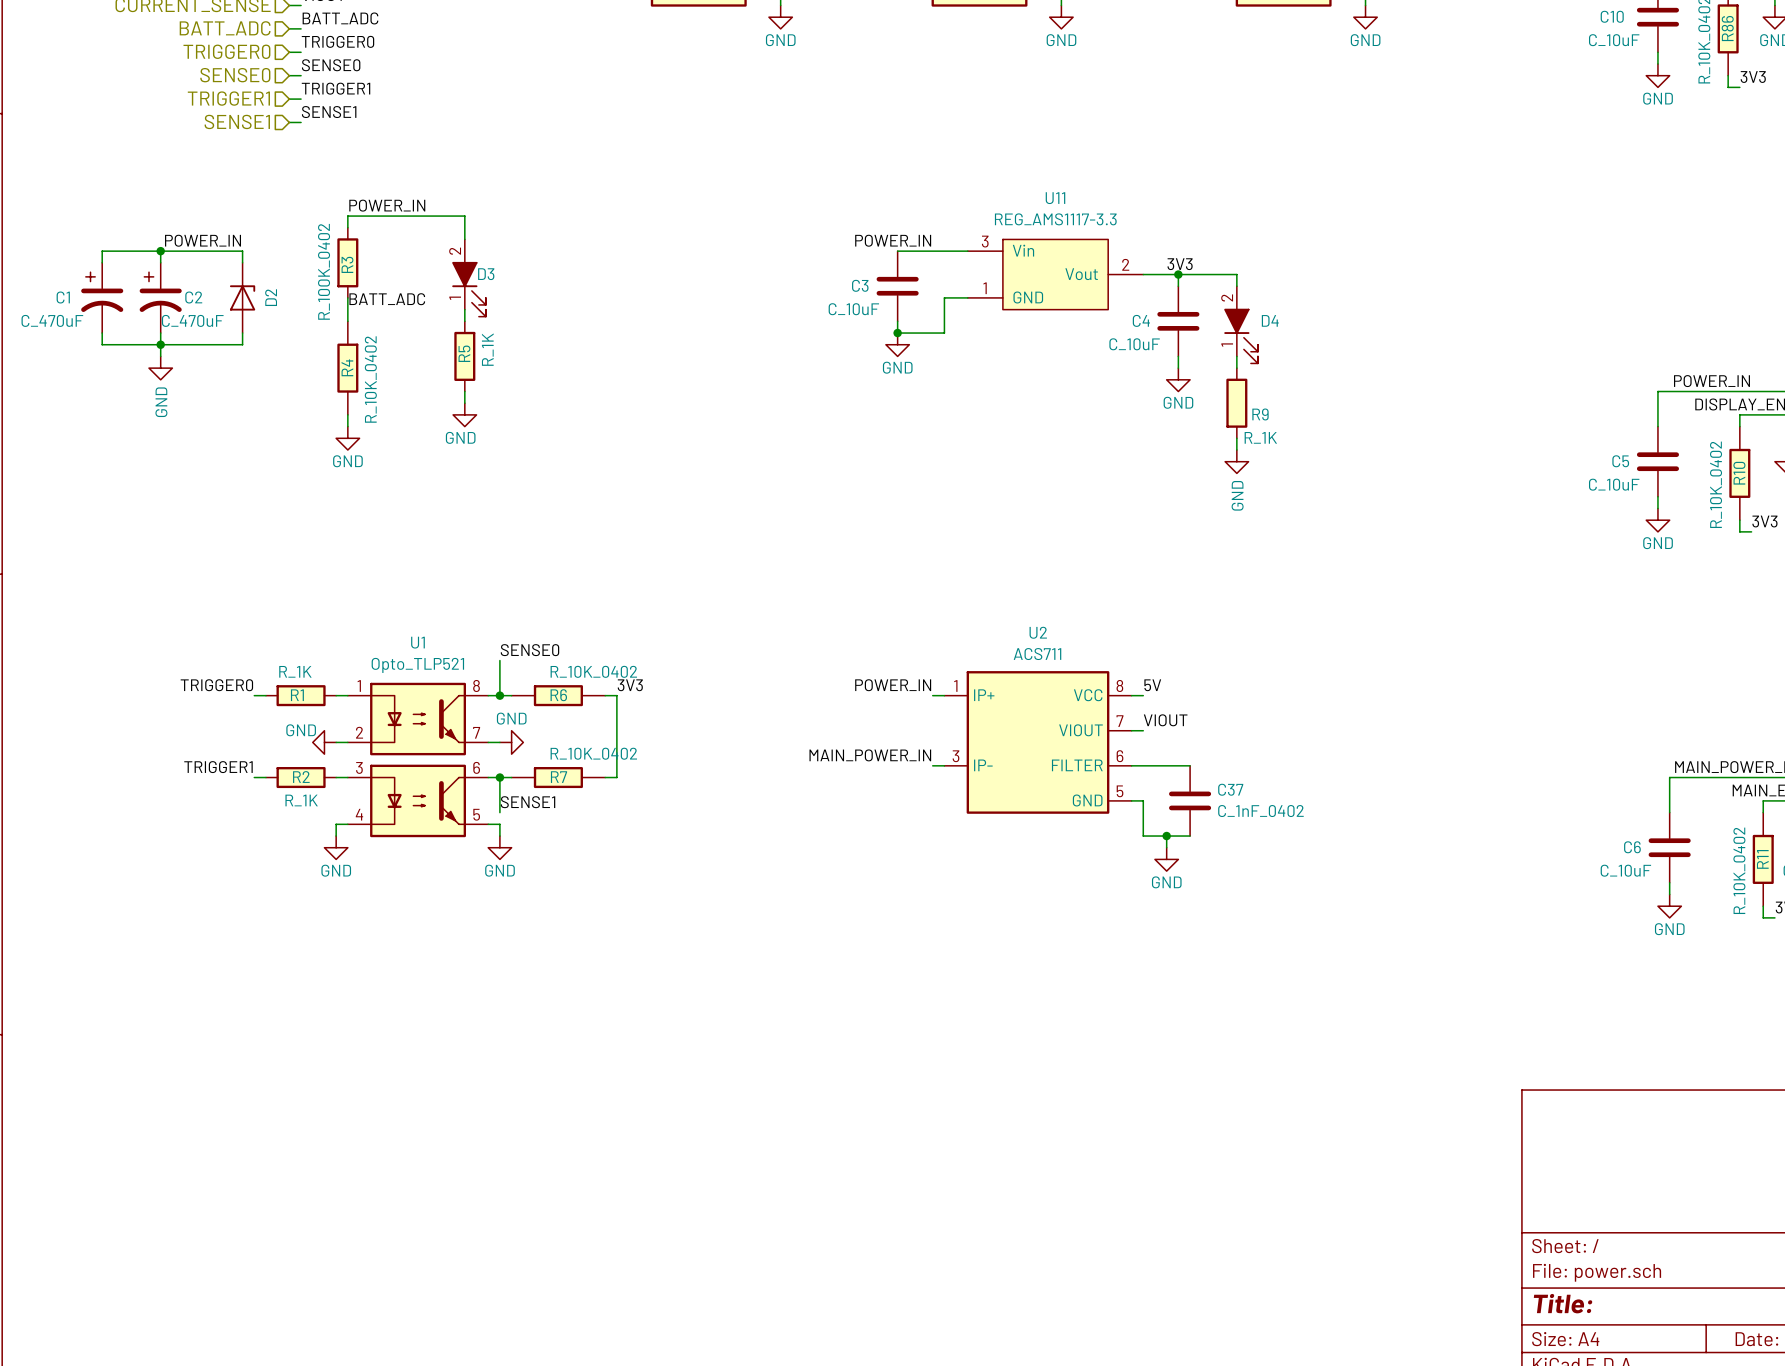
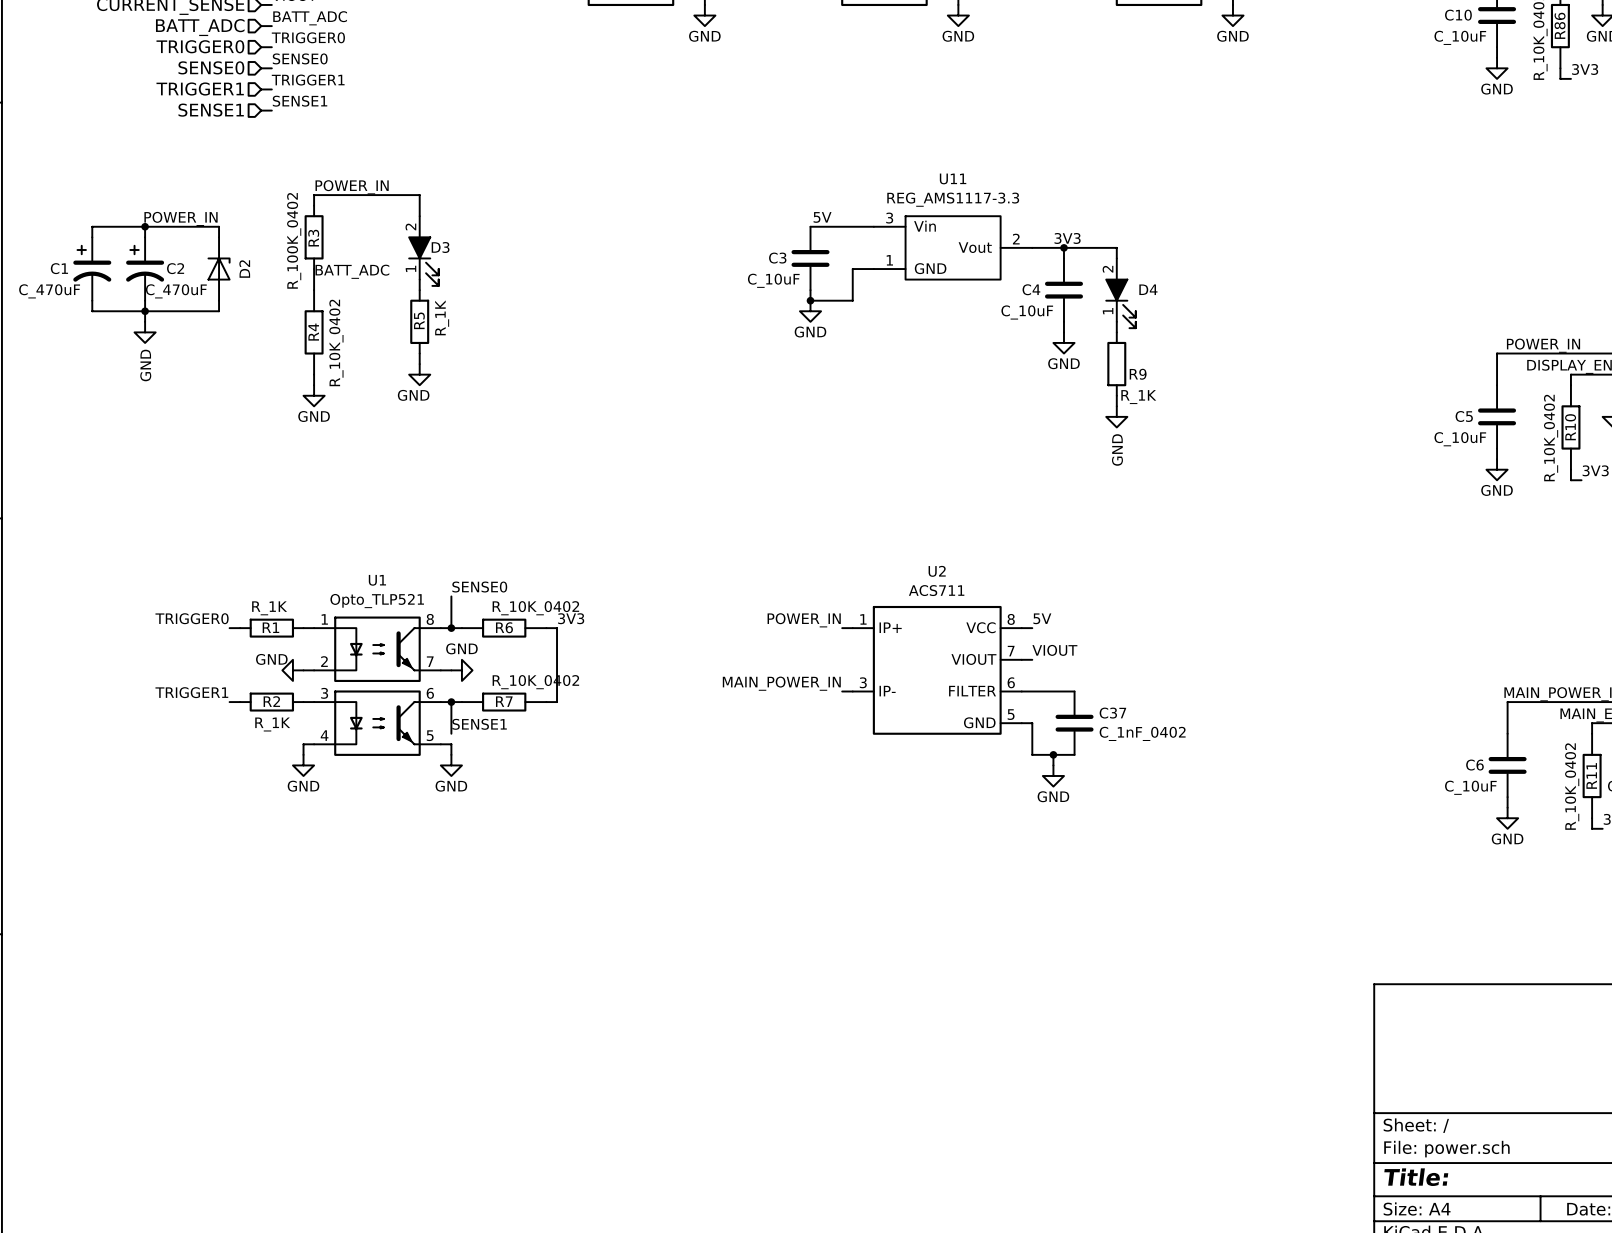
label: POWER_IN (893, 240) -> none
label: none -> 5V (822, 217)

